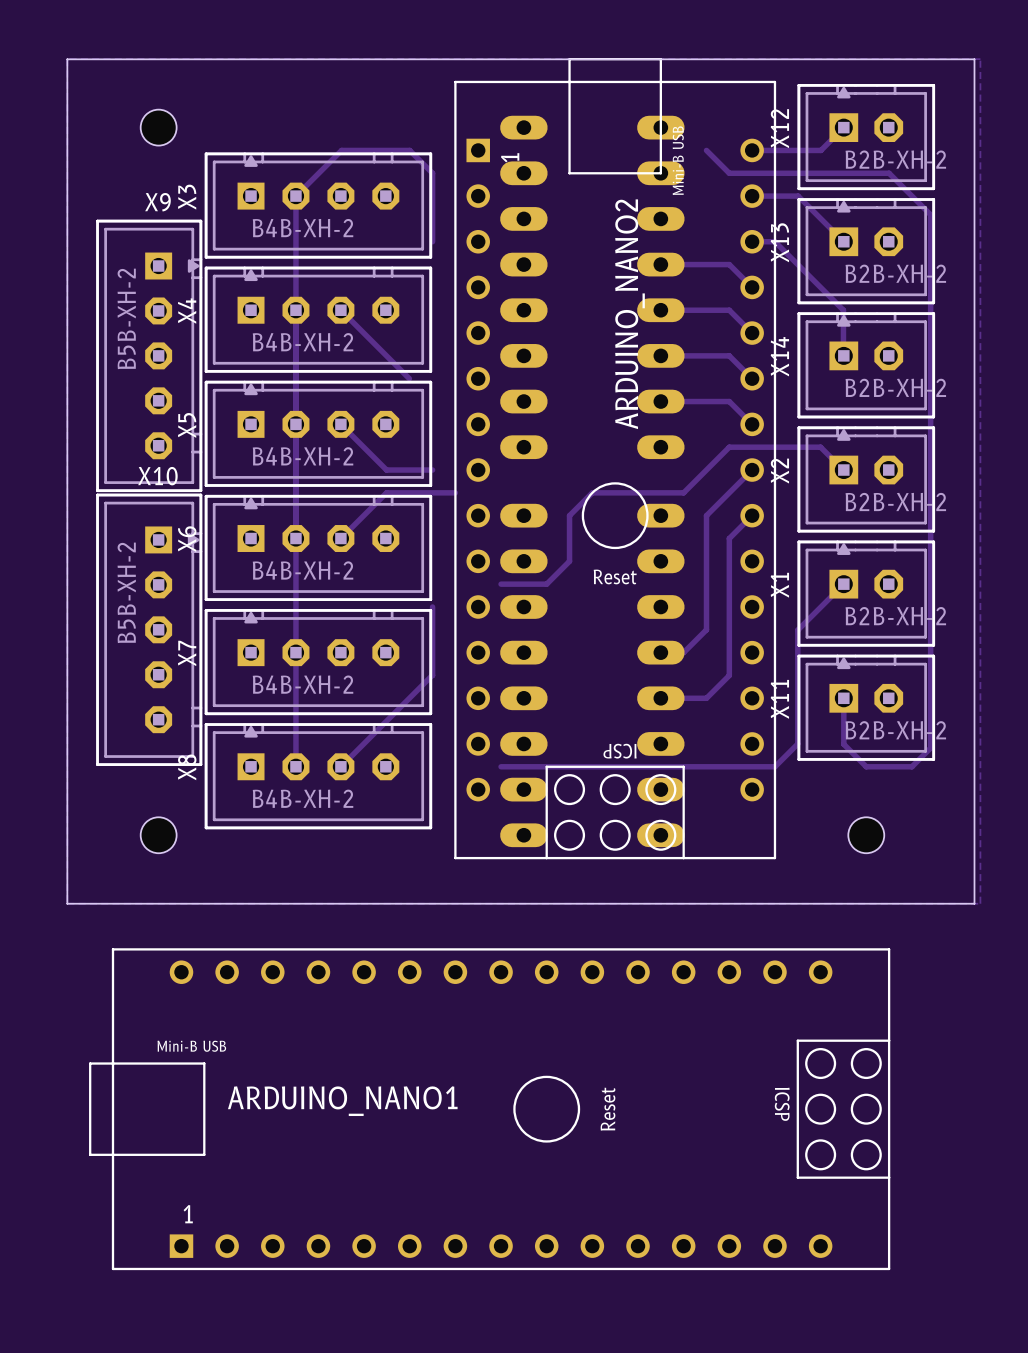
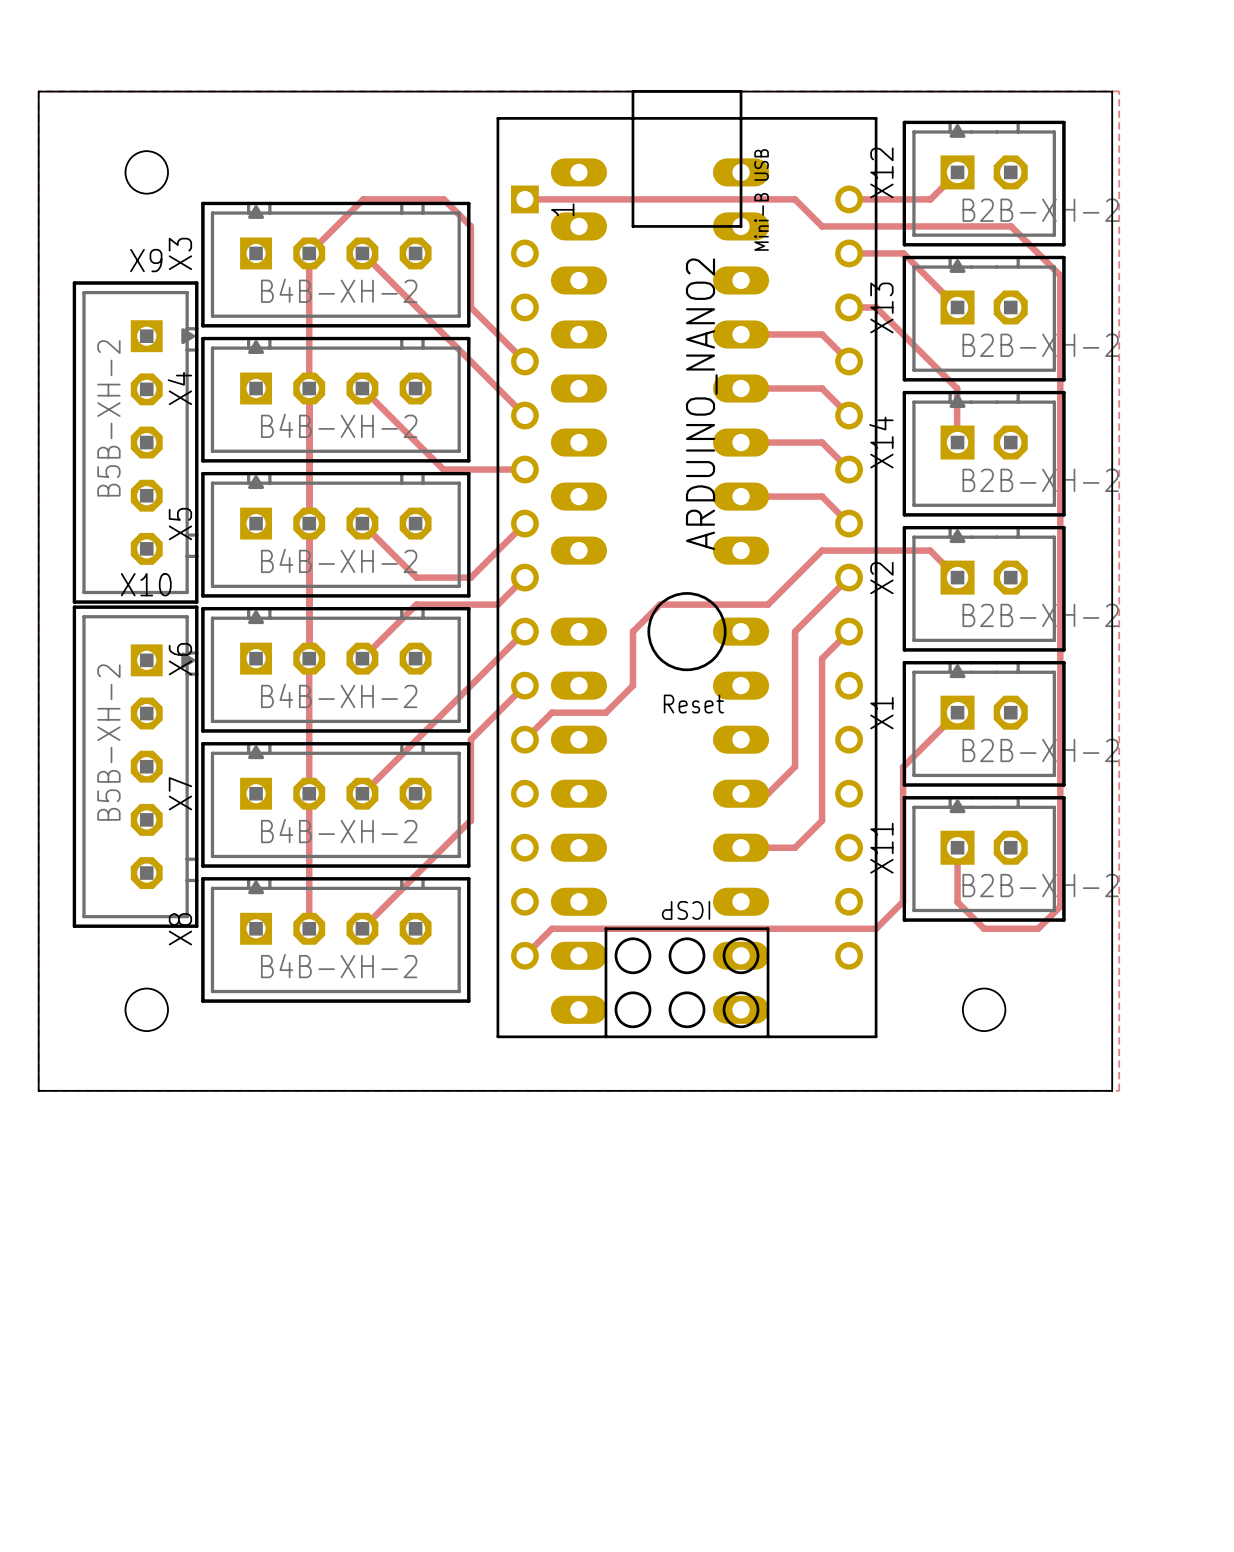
track: none -> (524, 199) (795, 199)
track: none -> (362, 253) (524, 415)
track: none -> (470, 307) (524, 361)
track: none -> (443, 469) (524, 469)
track: none -> (524, 523) (470, 577)
track: none -> (524, 577) (497, 604)
track: none -> (524, 631) (362, 793)
track: none -> (524, 685) (470, 739)
track: none -> (551, 712) (524, 739)
track: none -> (551, 928) (524, 955)
ARDUINO_NANO1: (489, 1109) -> none

